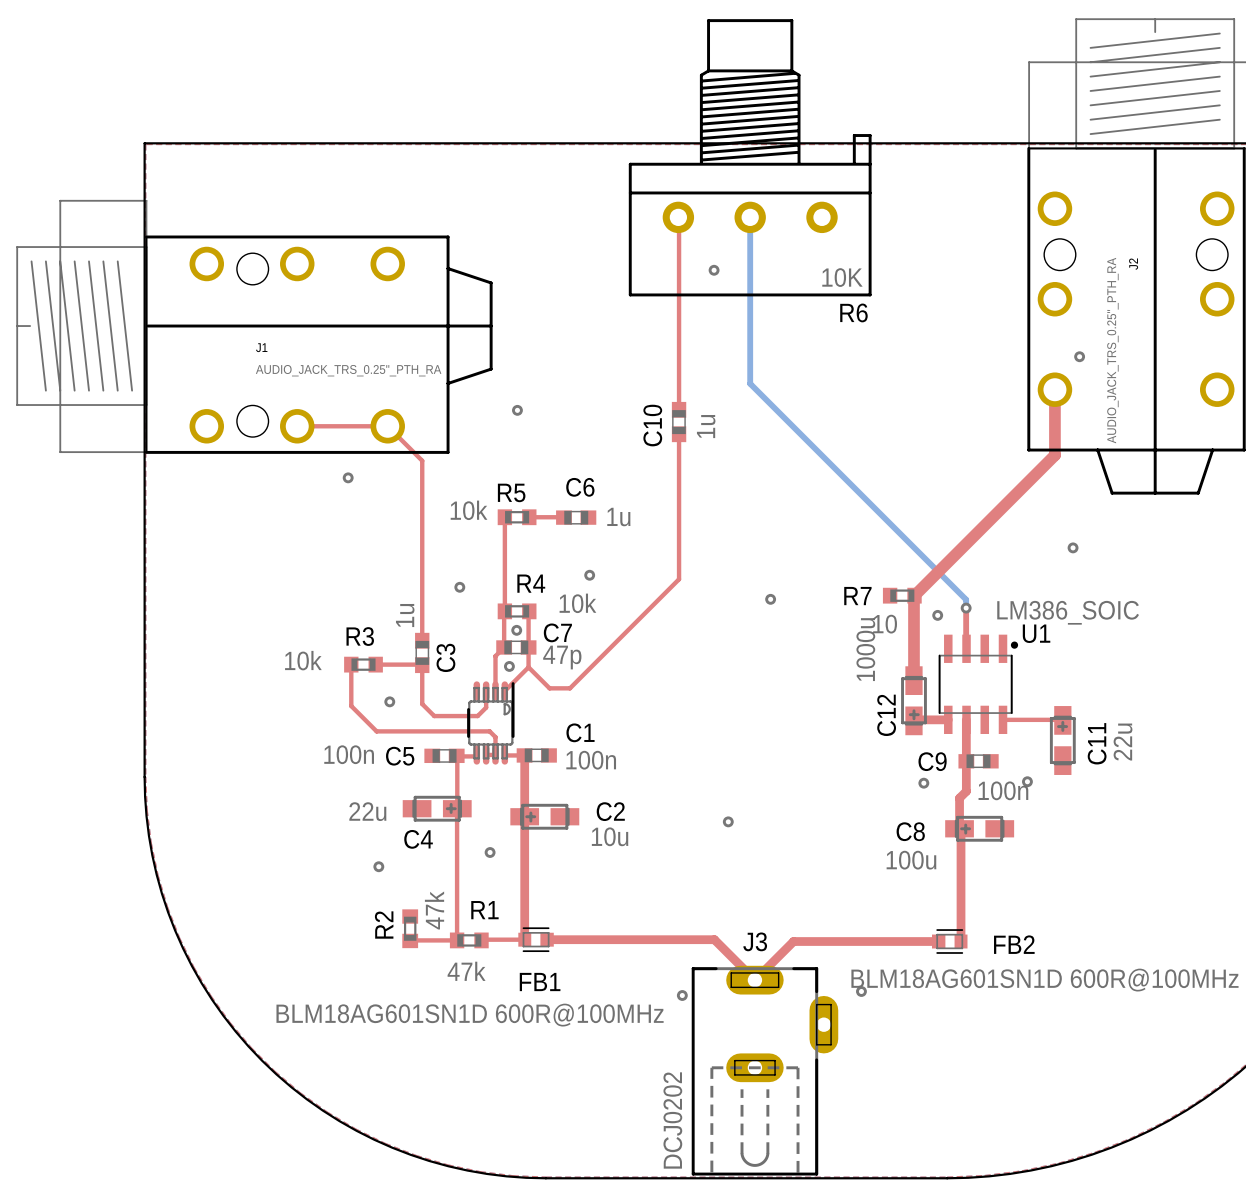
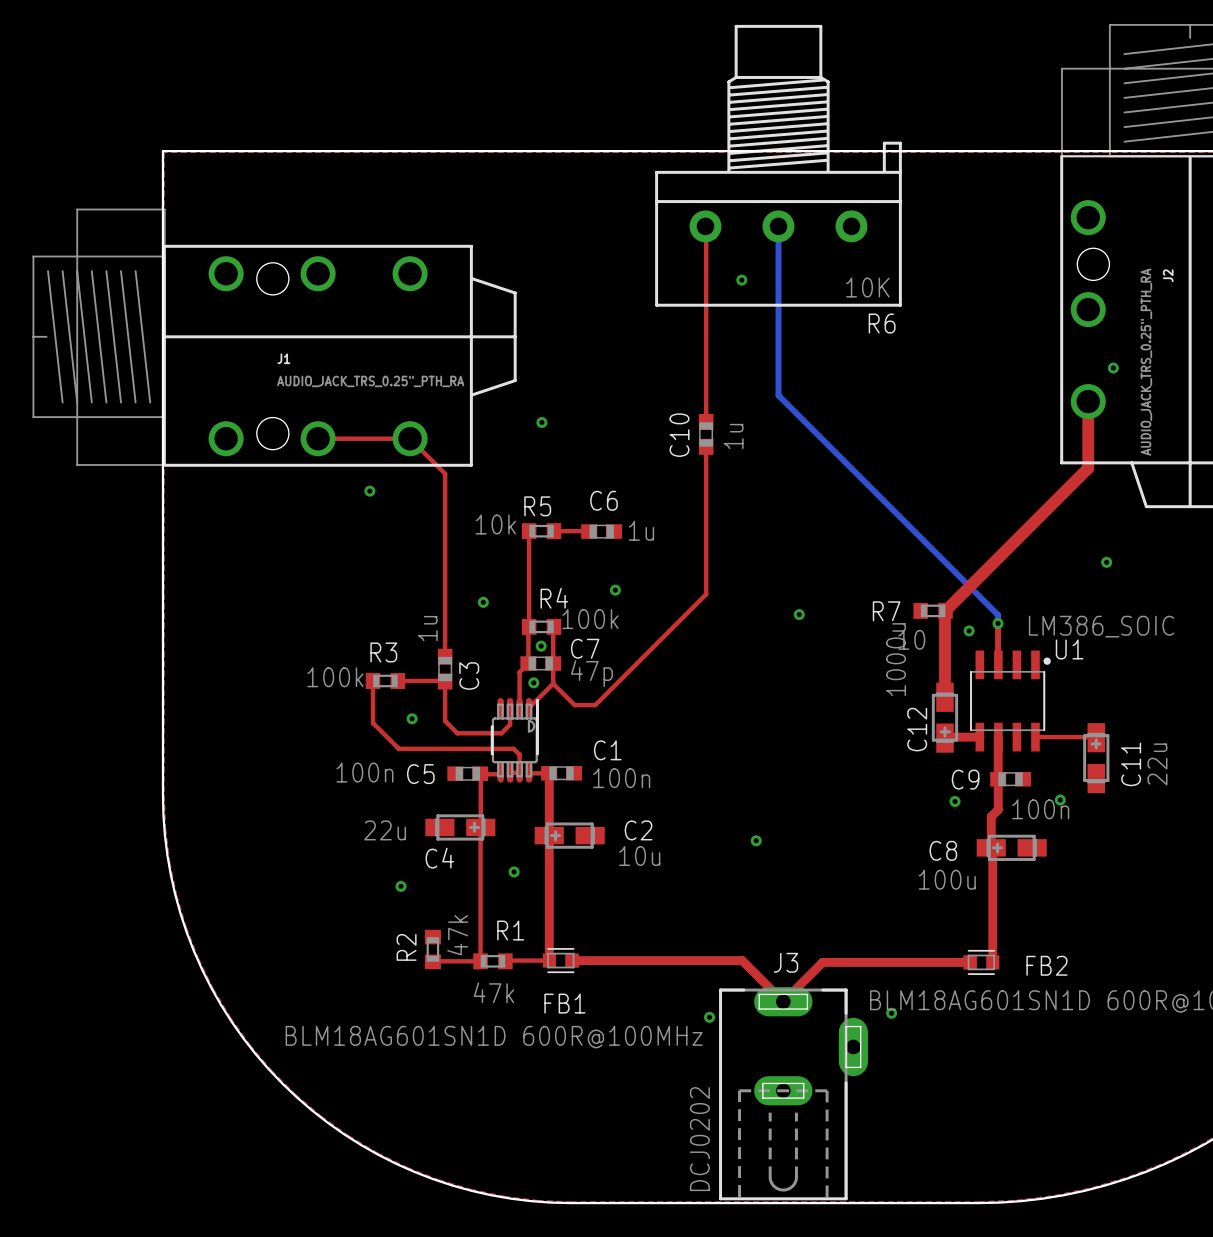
R4 value: 10k (577, 603) -> 100k (590, 619)
R3 value: 10k (303, 660) -> 100k (335, 677)

